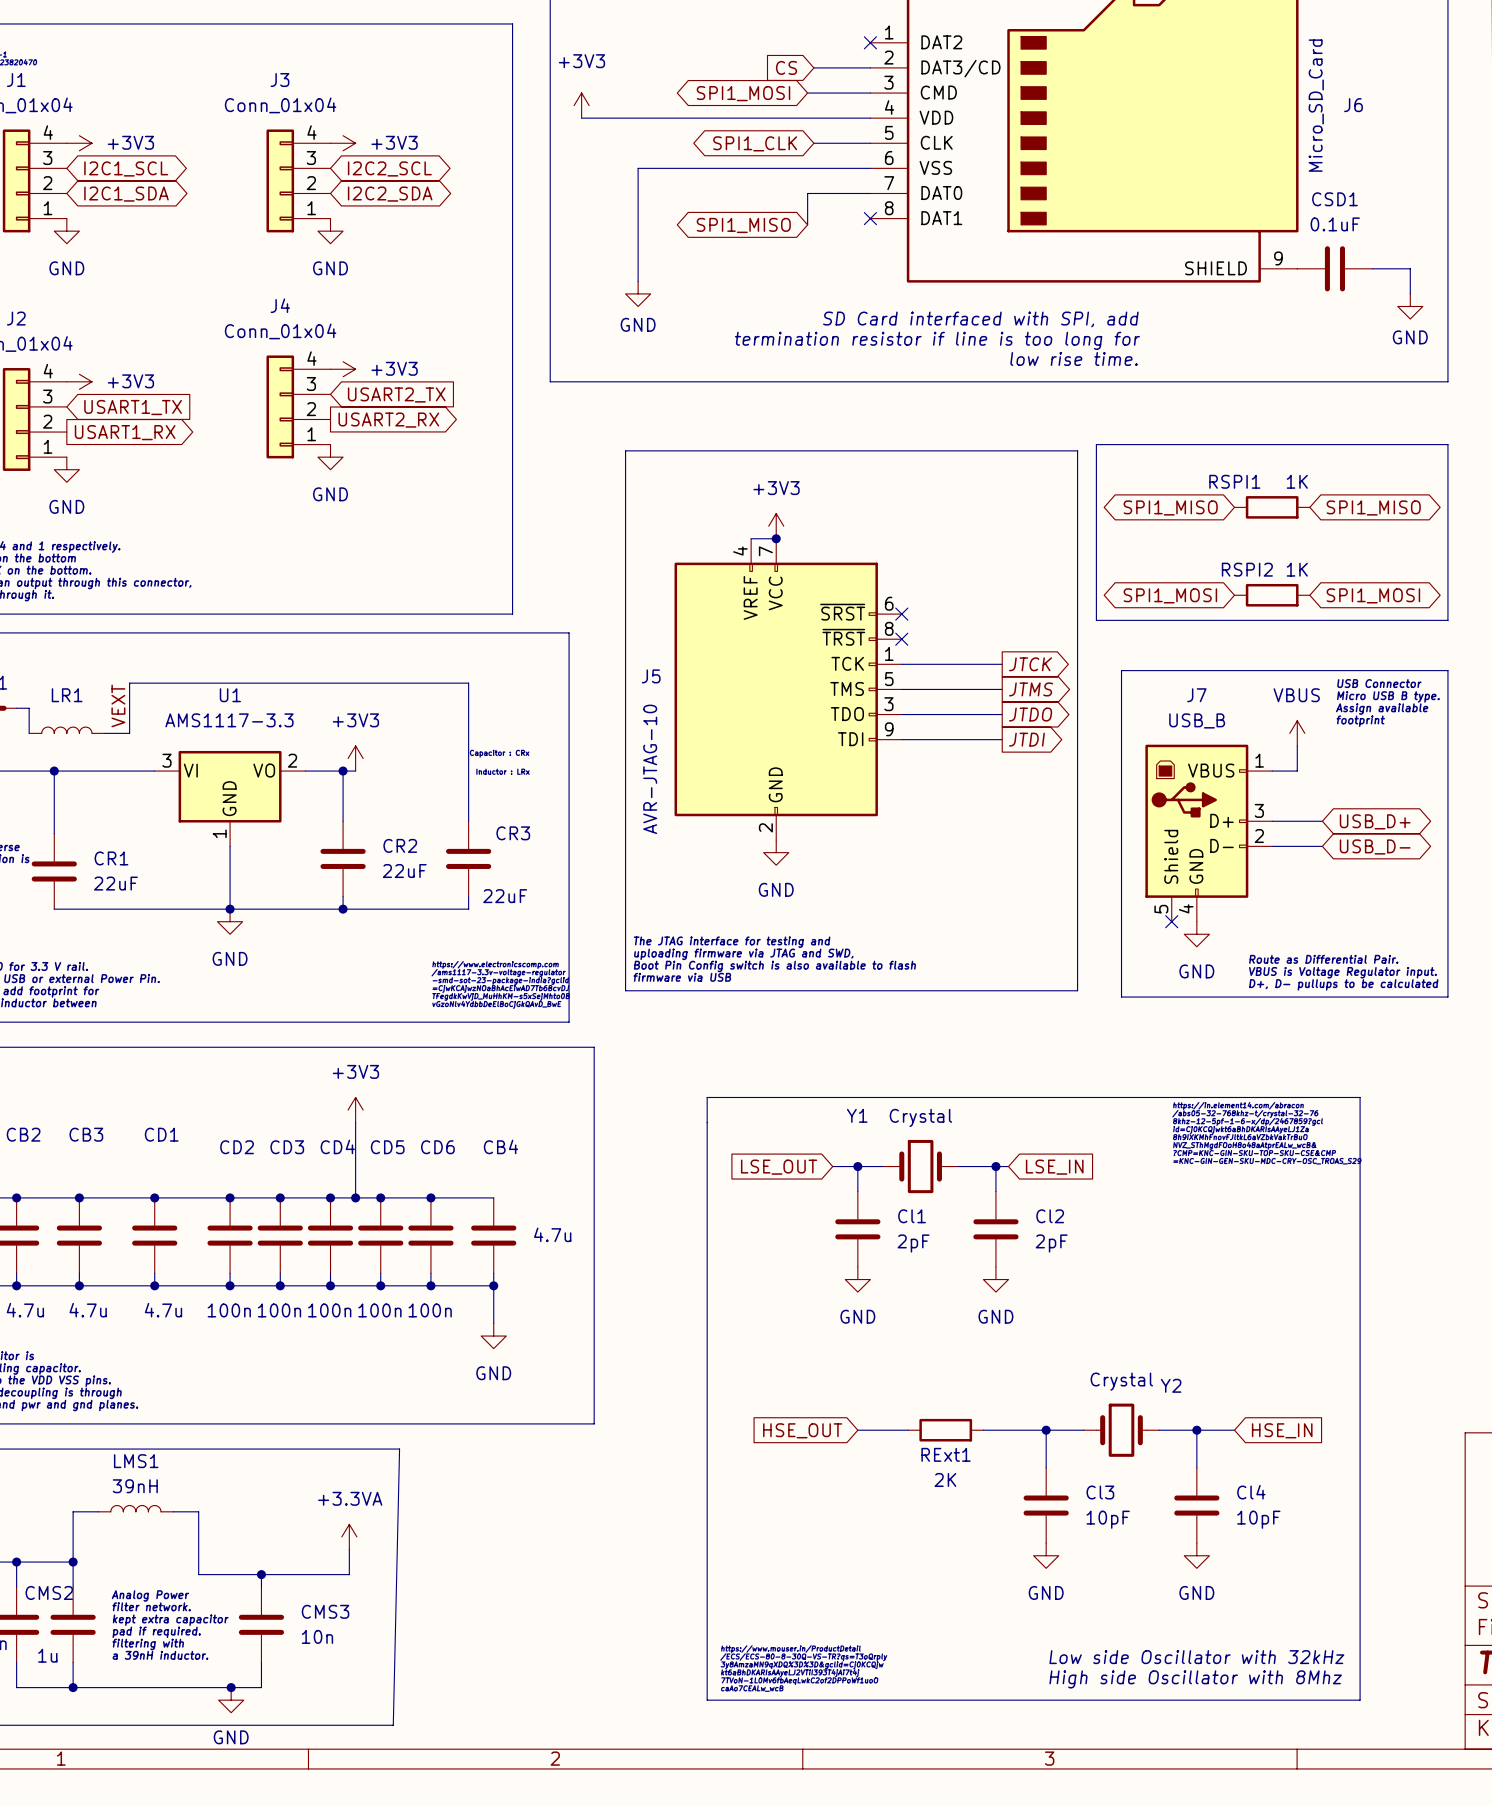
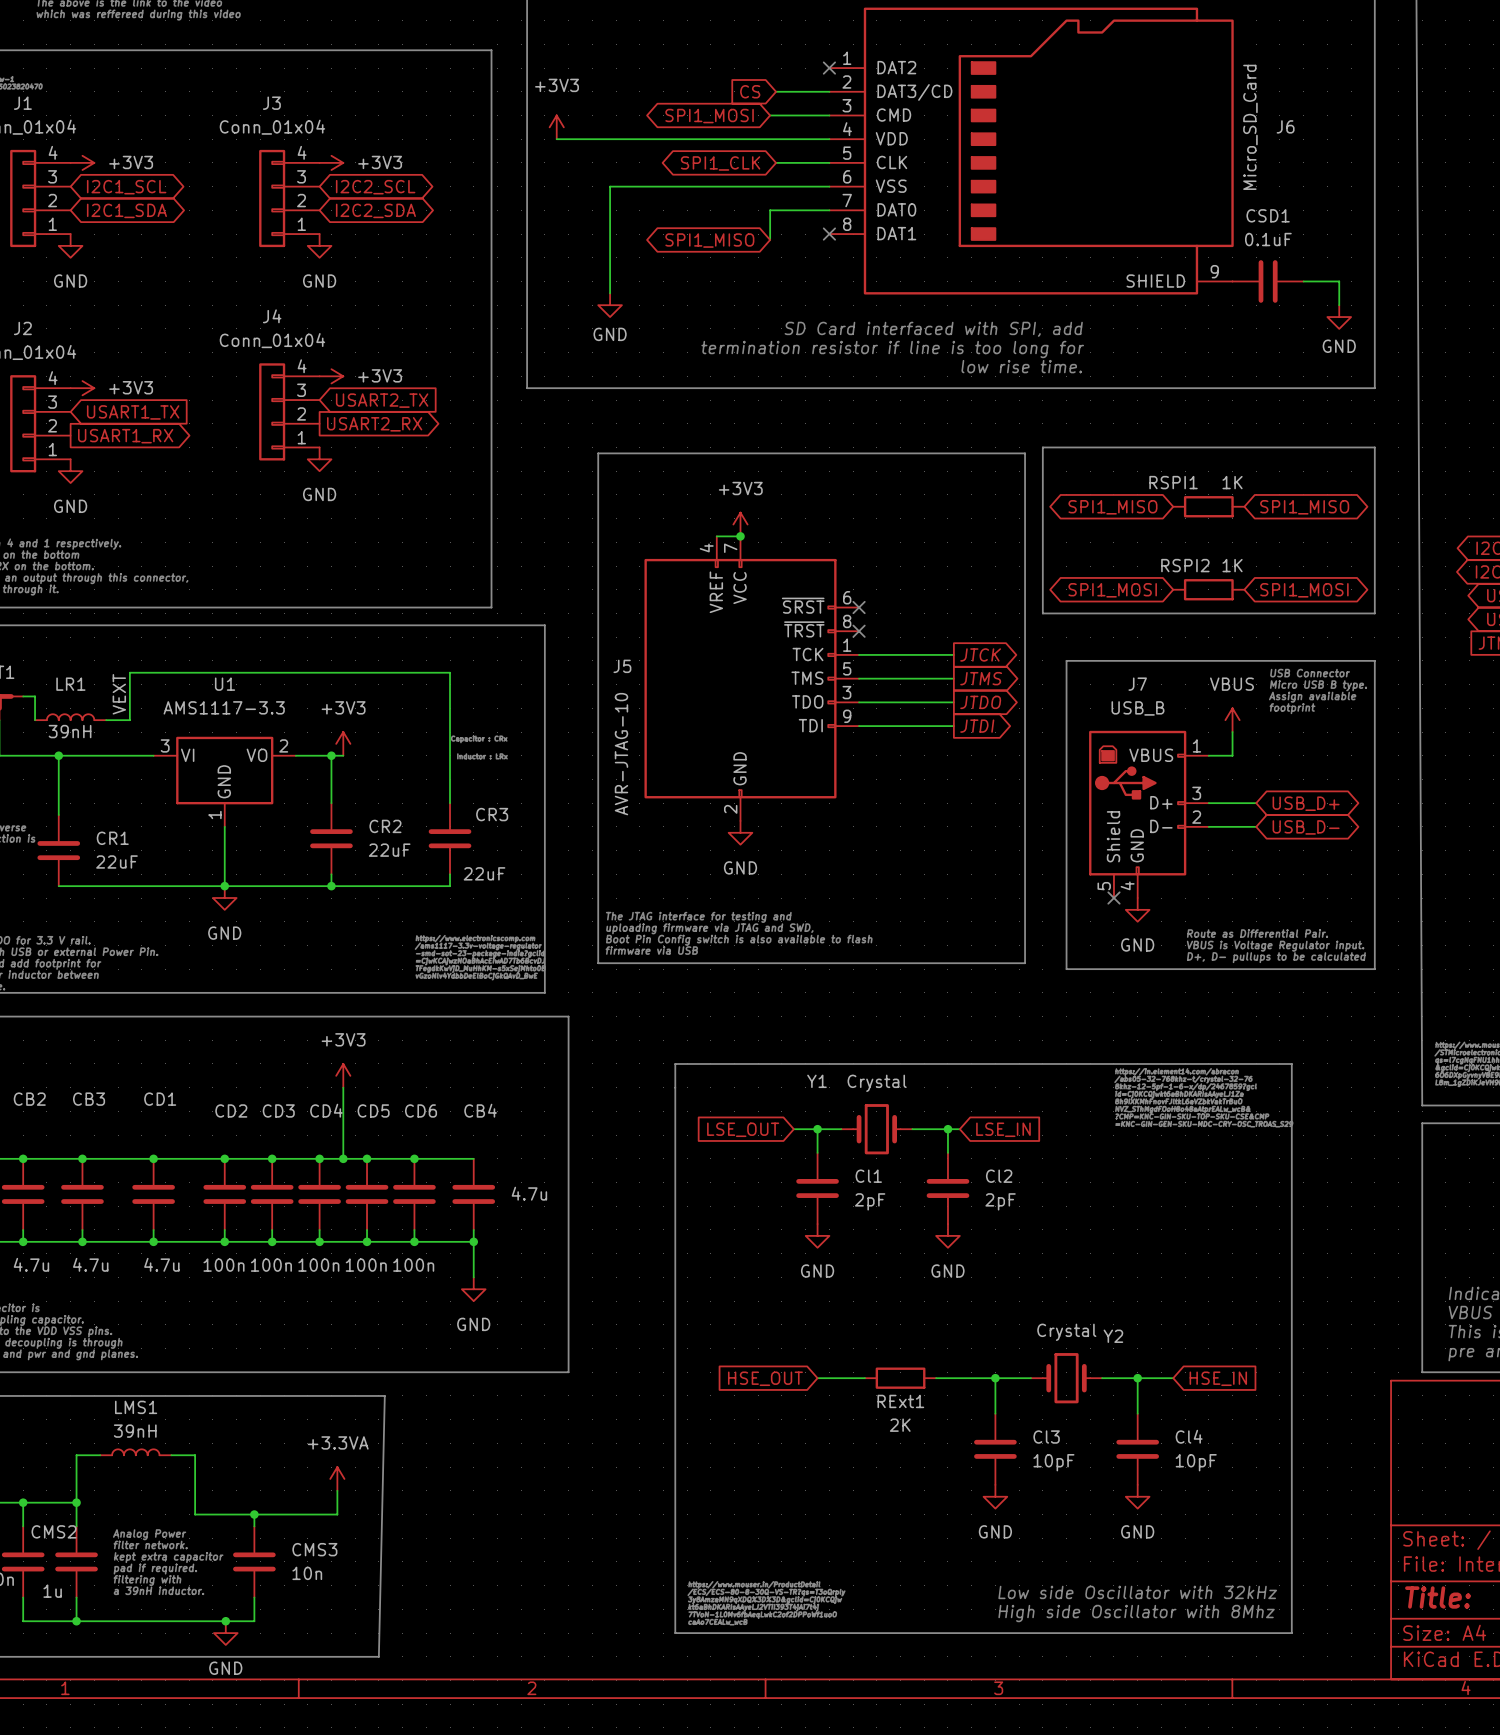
LR1 value: none -> 39nH (70, 731)

